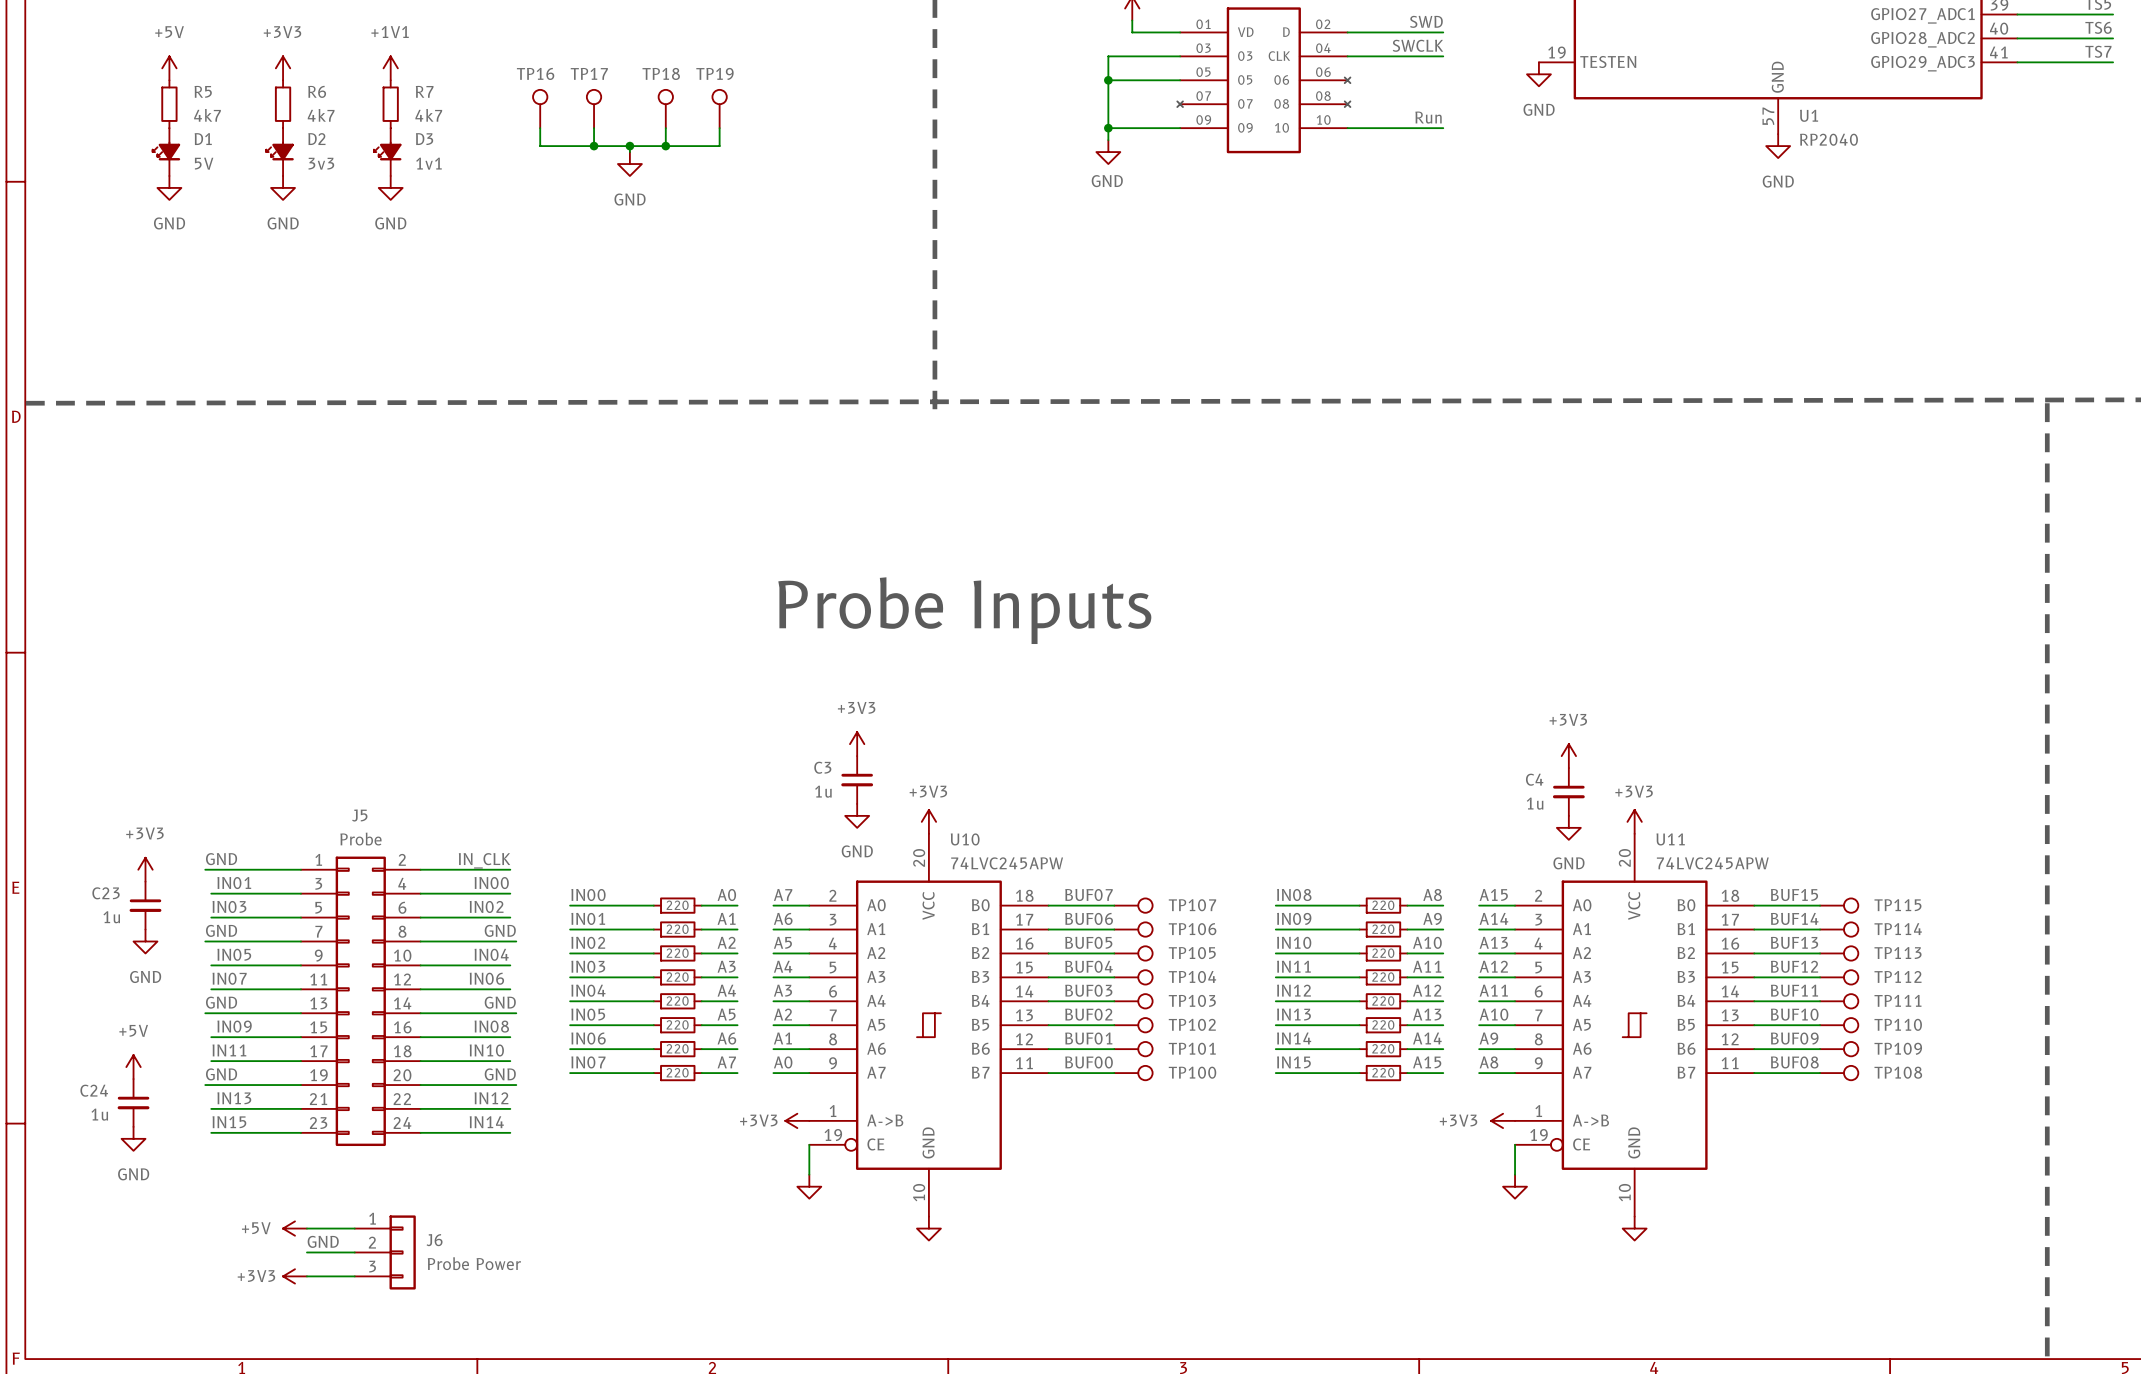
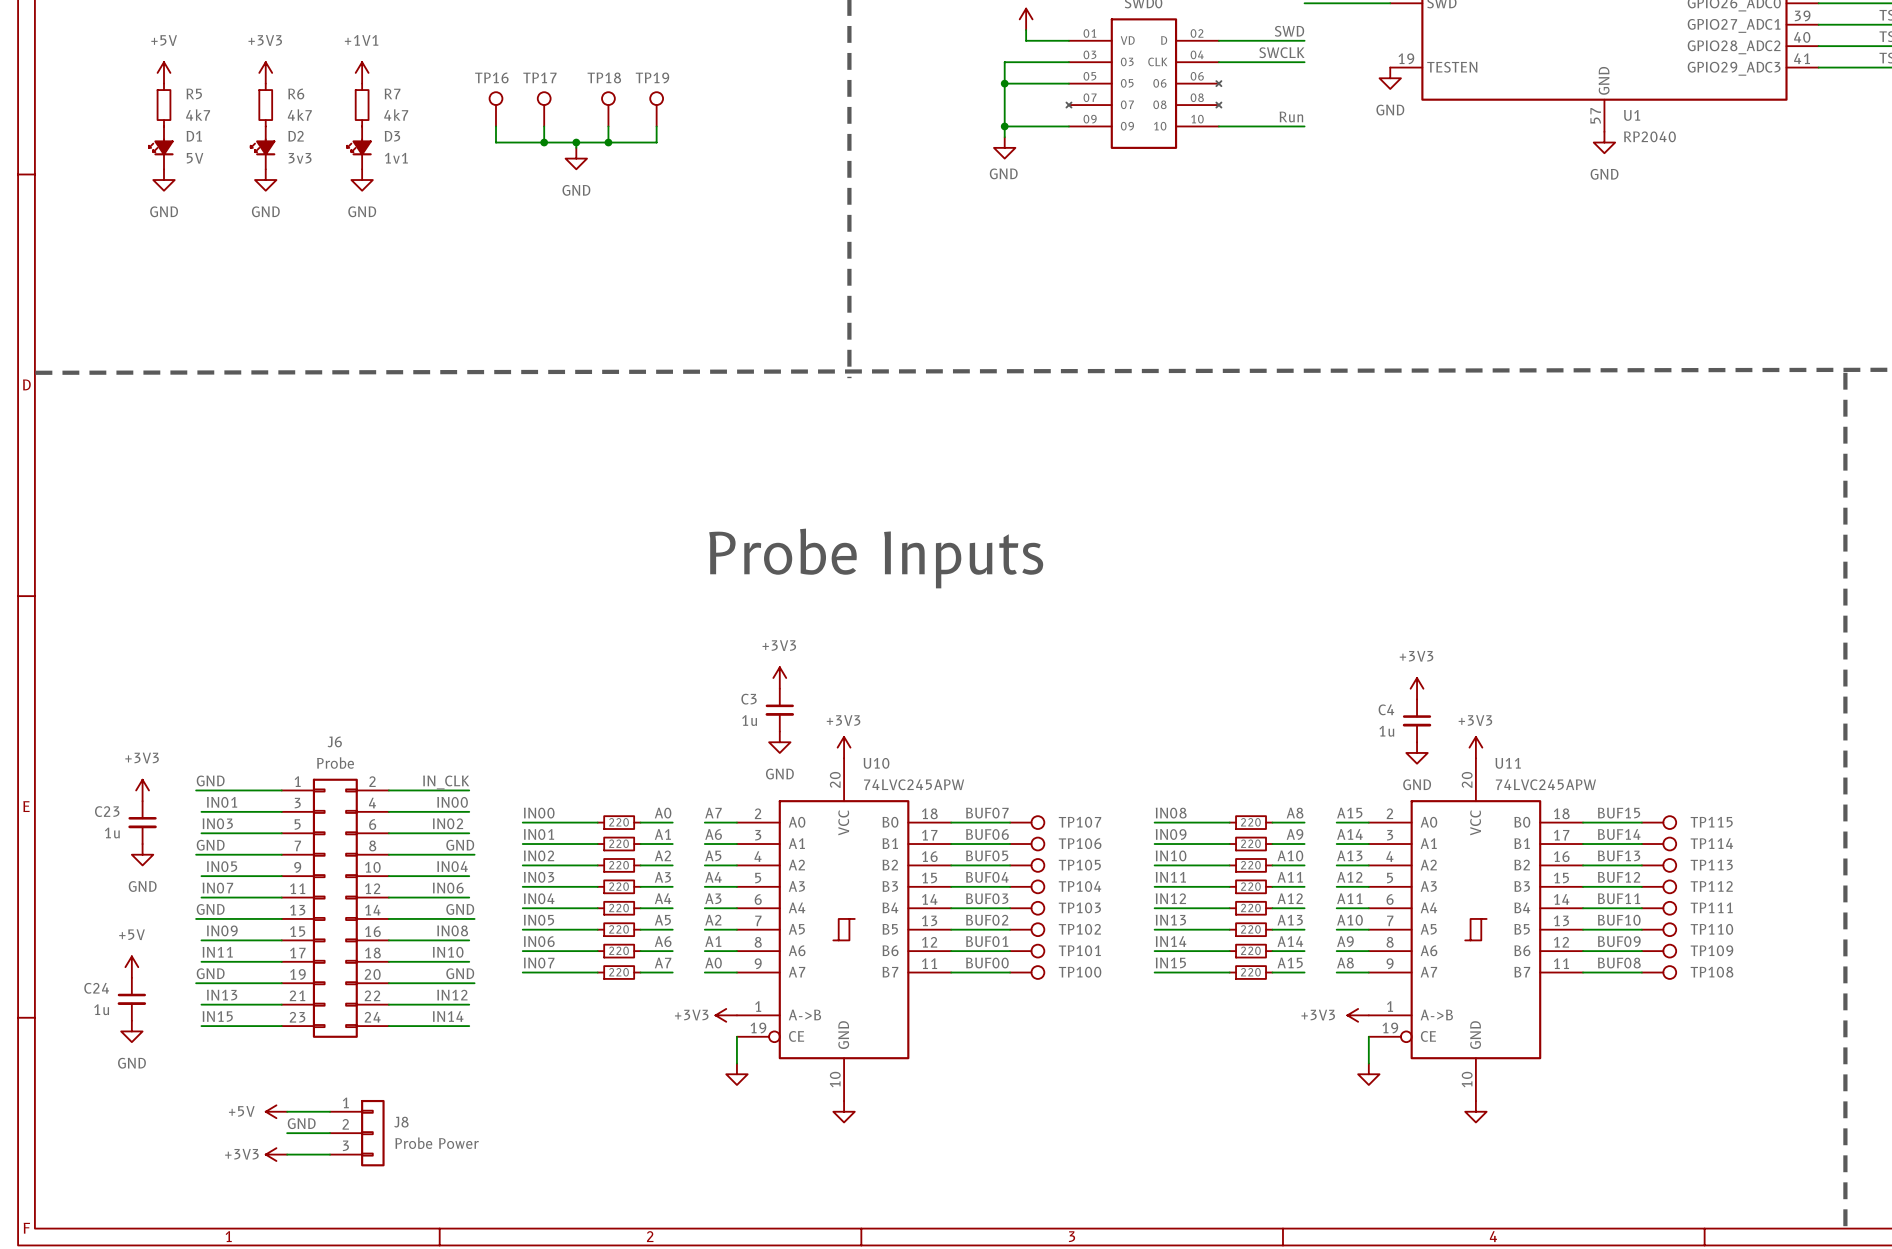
J5 name: J5 (359, 815) -> J6 (334, 741)
J6 name: J6 (434, 1240) -> J8 (401, 1122)

